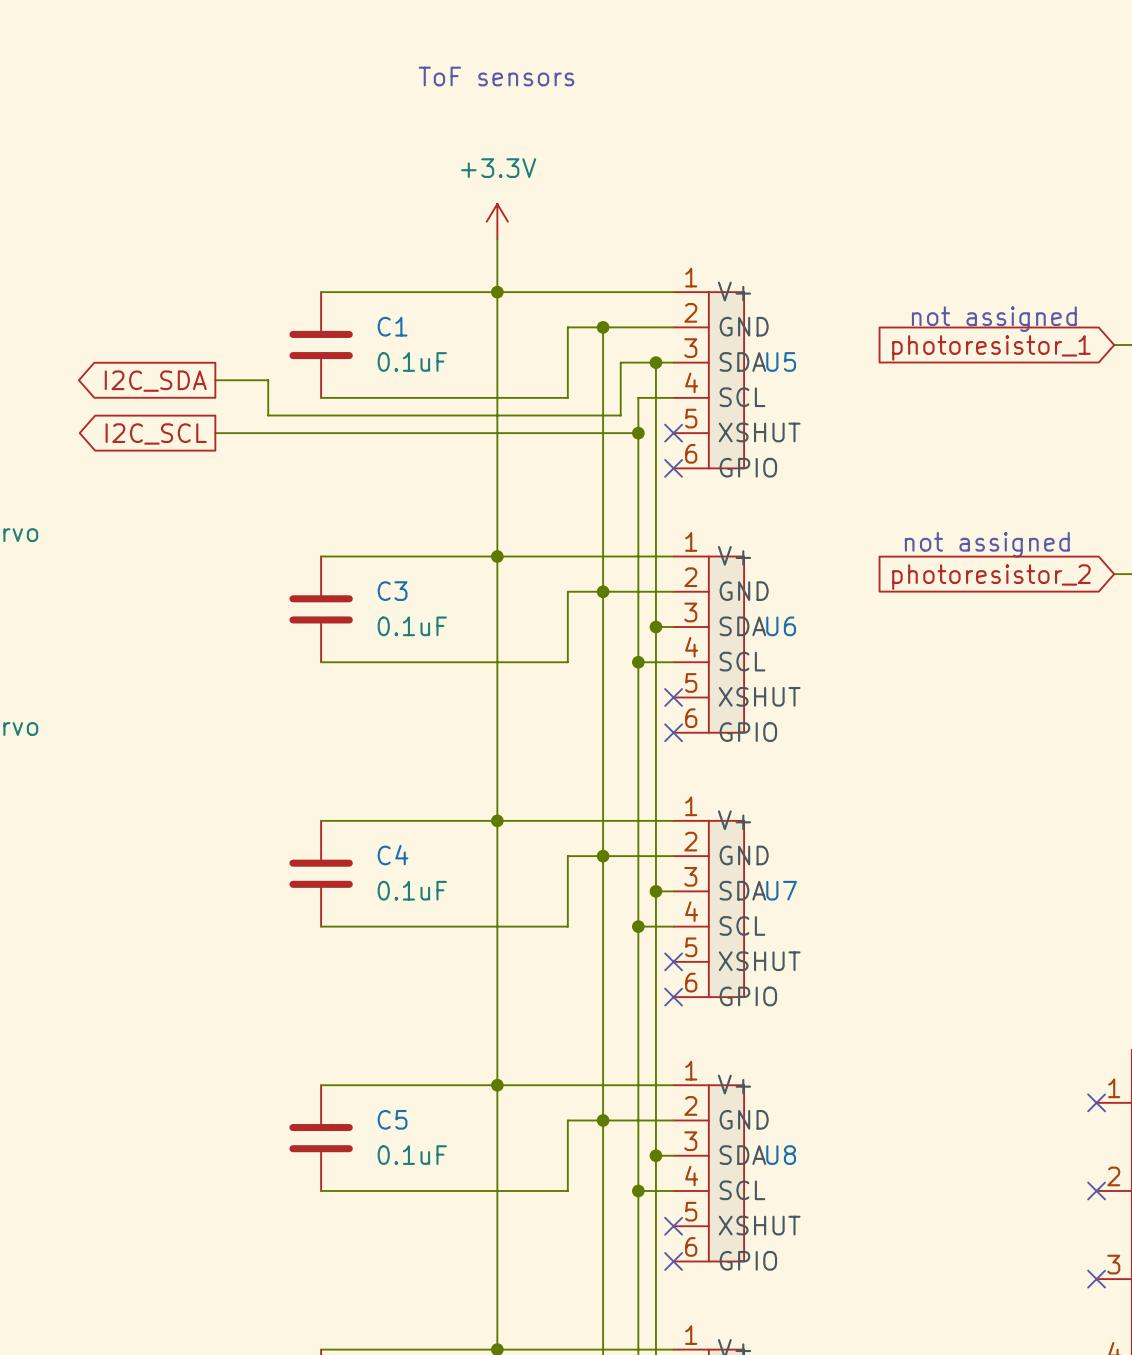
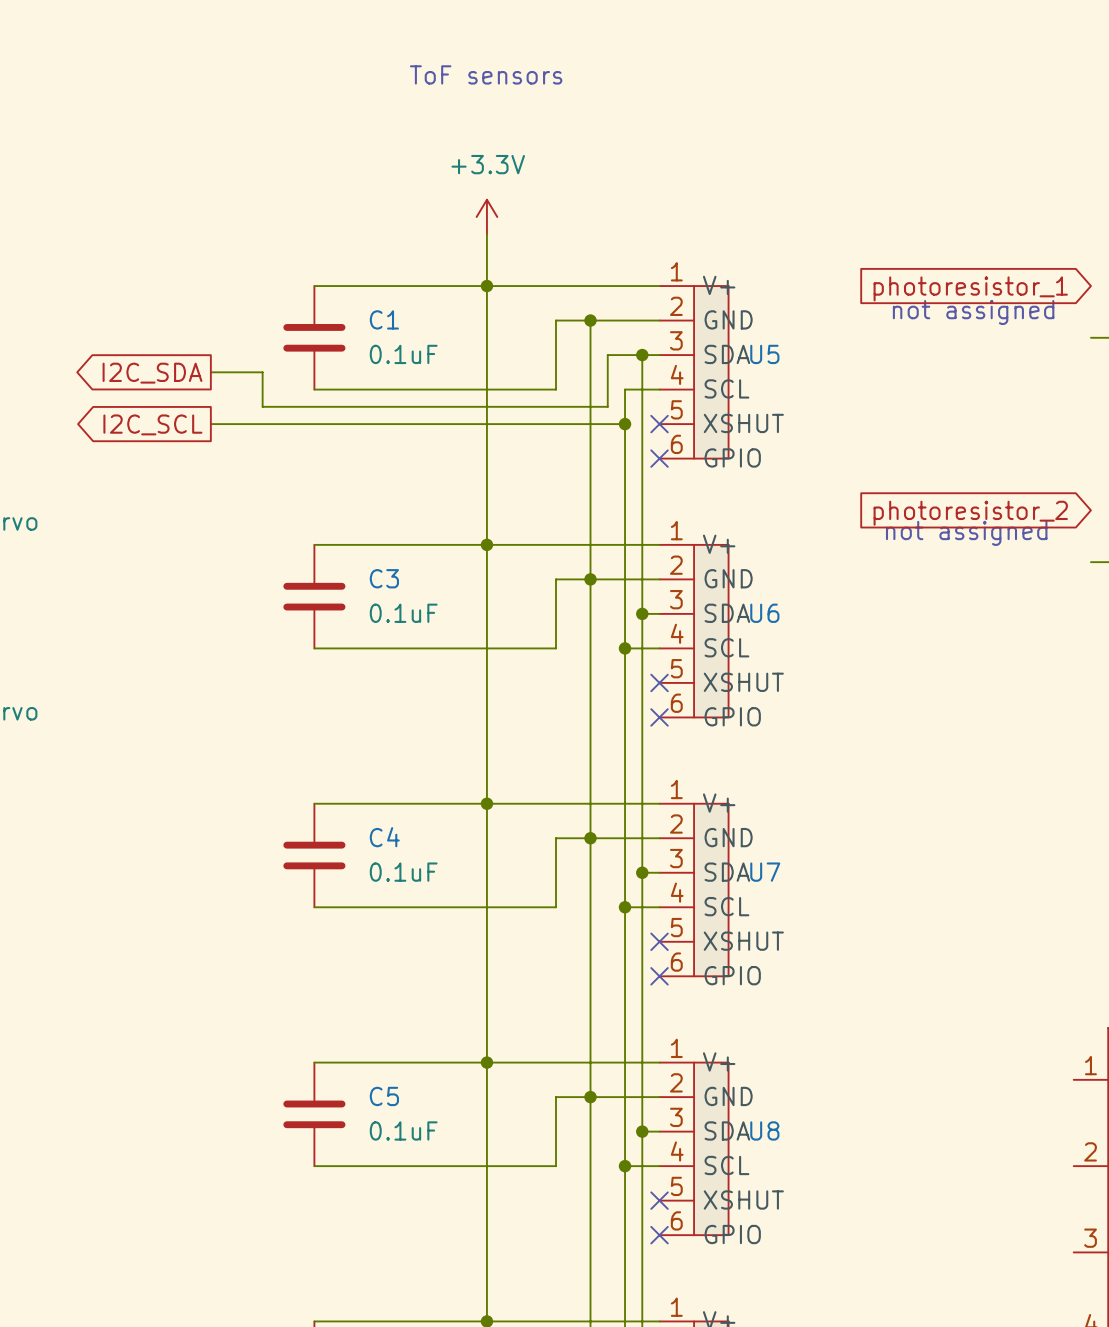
global label position: photoresistor_1 (991, 347) -> photoresistor_1 (970, 288)
global label position: photoresistor_2 (991, 577) -> photoresistor_2 (970, 513)
no-connect mark: (1096, 1102) -> none
no-connect mark: (1096, 1190) -> none
no-connect mark: (1096, 1279) -> none

